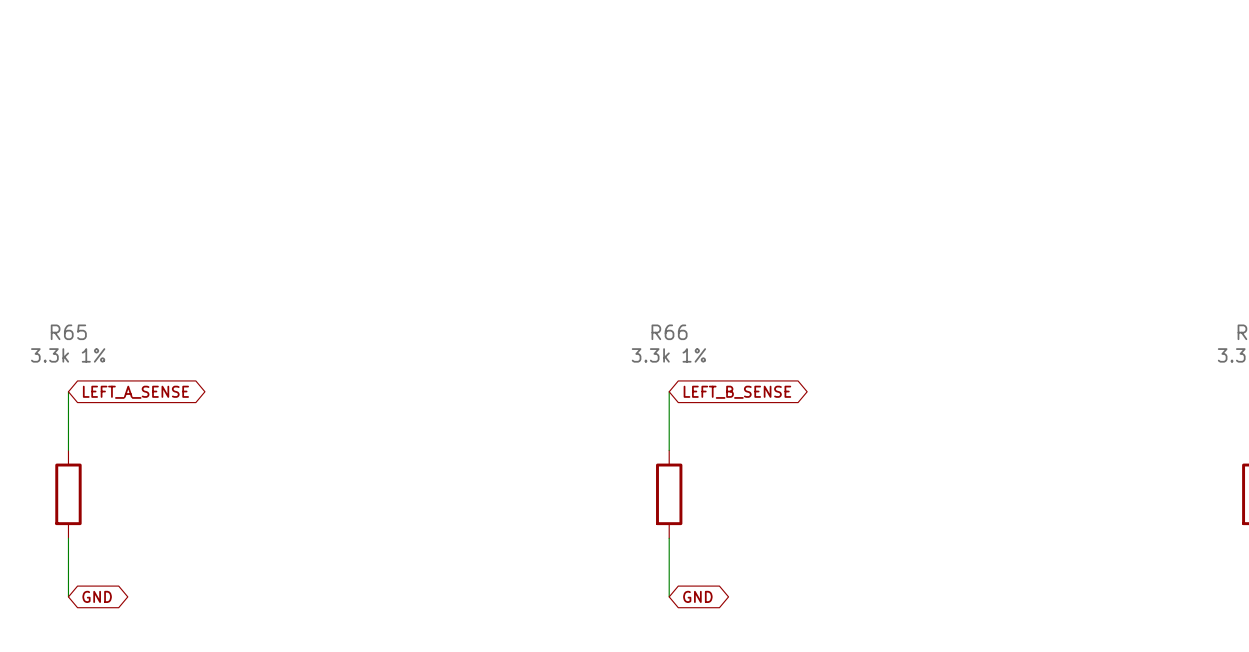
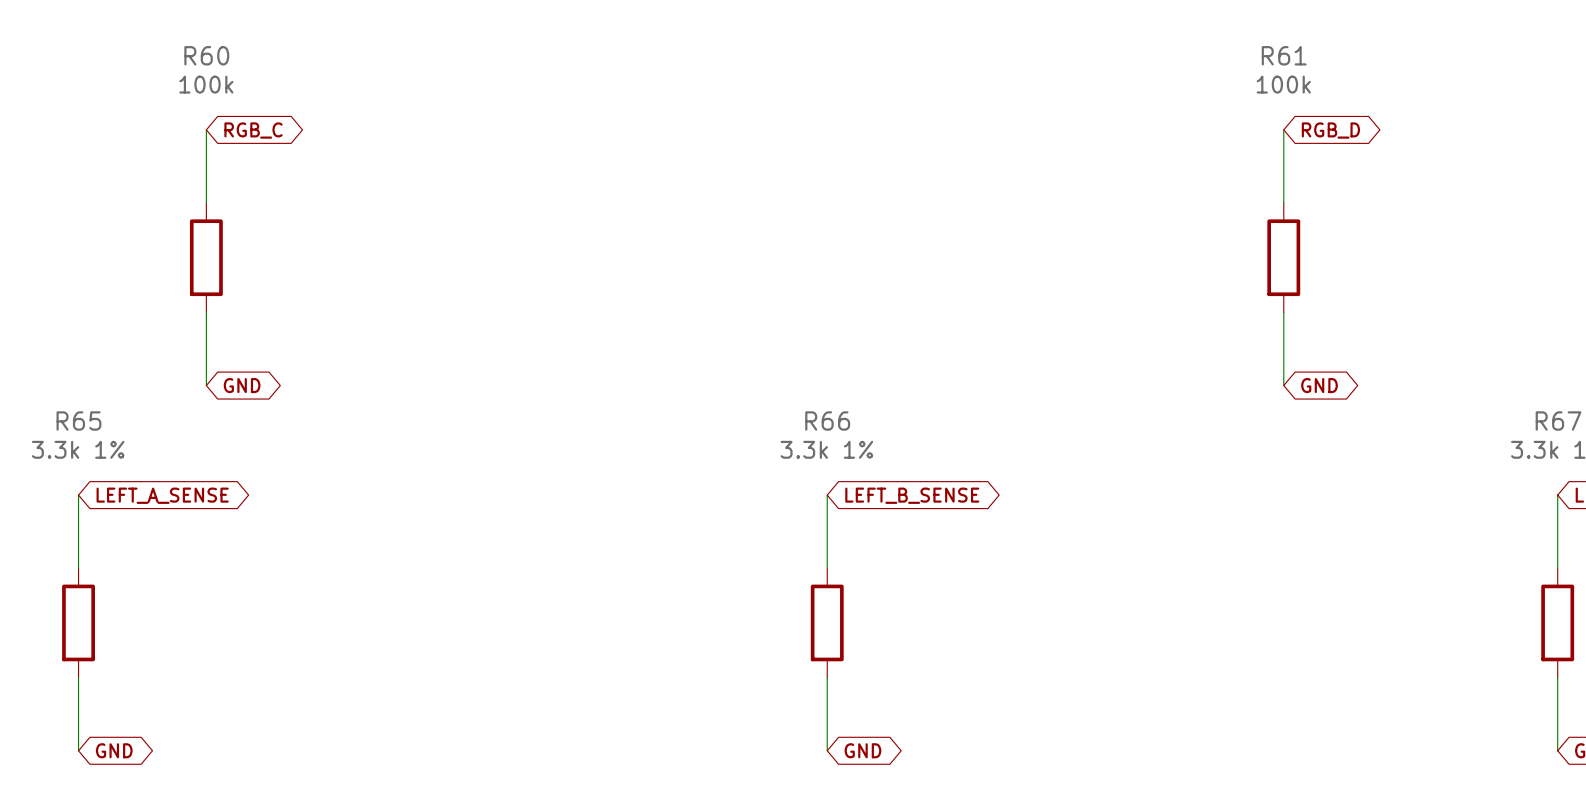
wire: none -> (206, 129) (206, 202)
wire: none -> (1283, 129) (1283, 202)
global label: none -> RGB_C (253, 130)
global label: none -> RGB_D (1330, 130)
R60: none -> 100k (206, 257)
R61: none -> 100k (1283, 257)
wire: none -> (206, 312) (206, 385)
wire: none -> (1283, 312) (1283, 385)
global label: none -> GND (242, 385)
global label: none -> GND (1319, 385)

